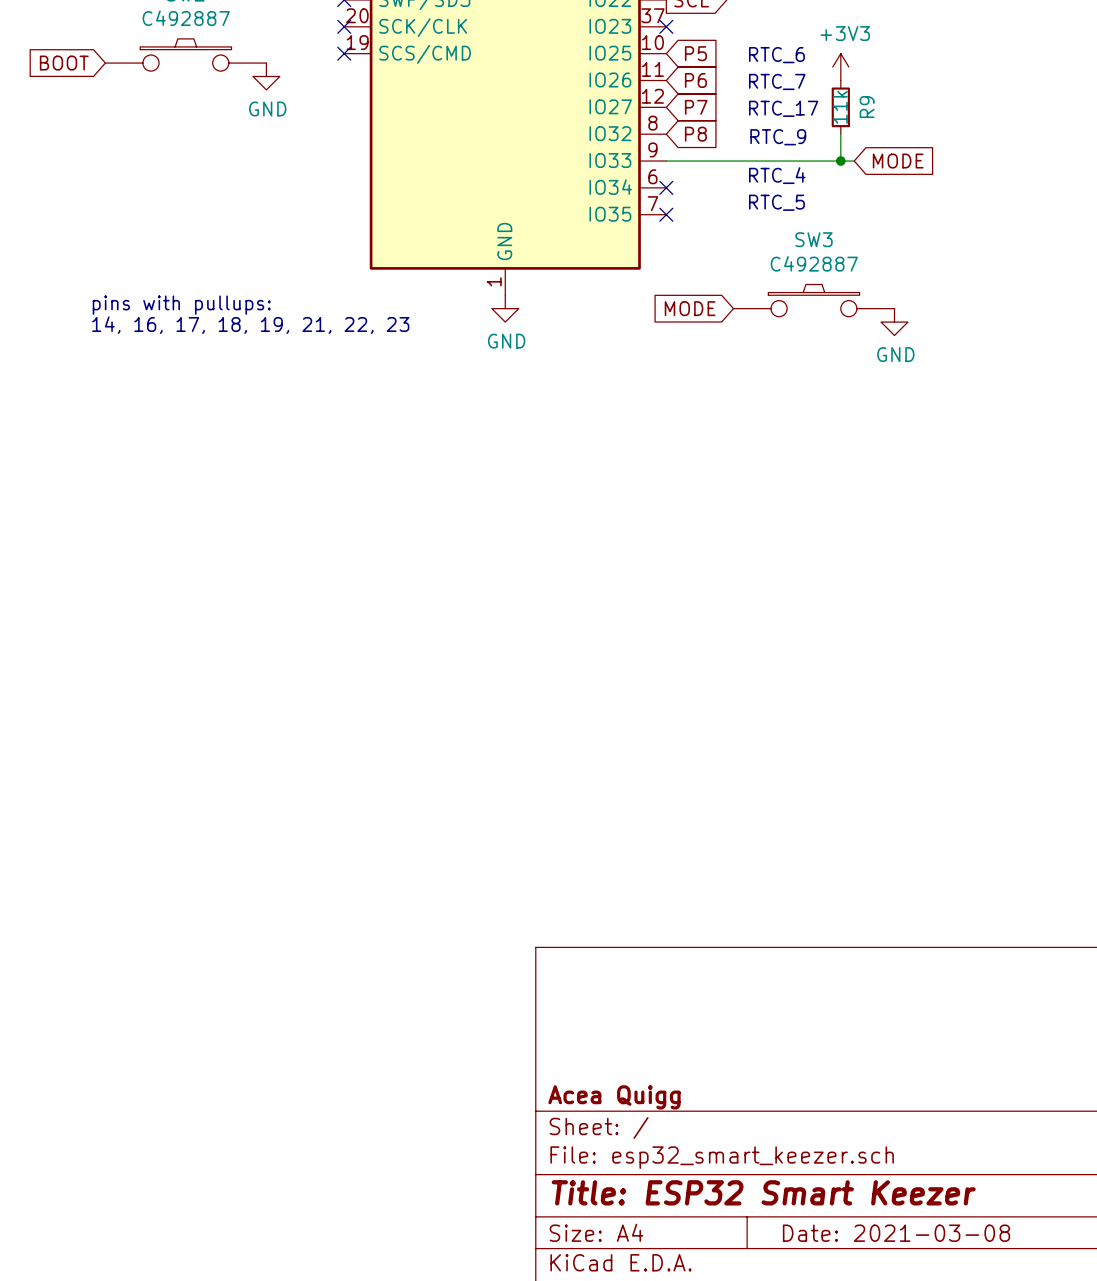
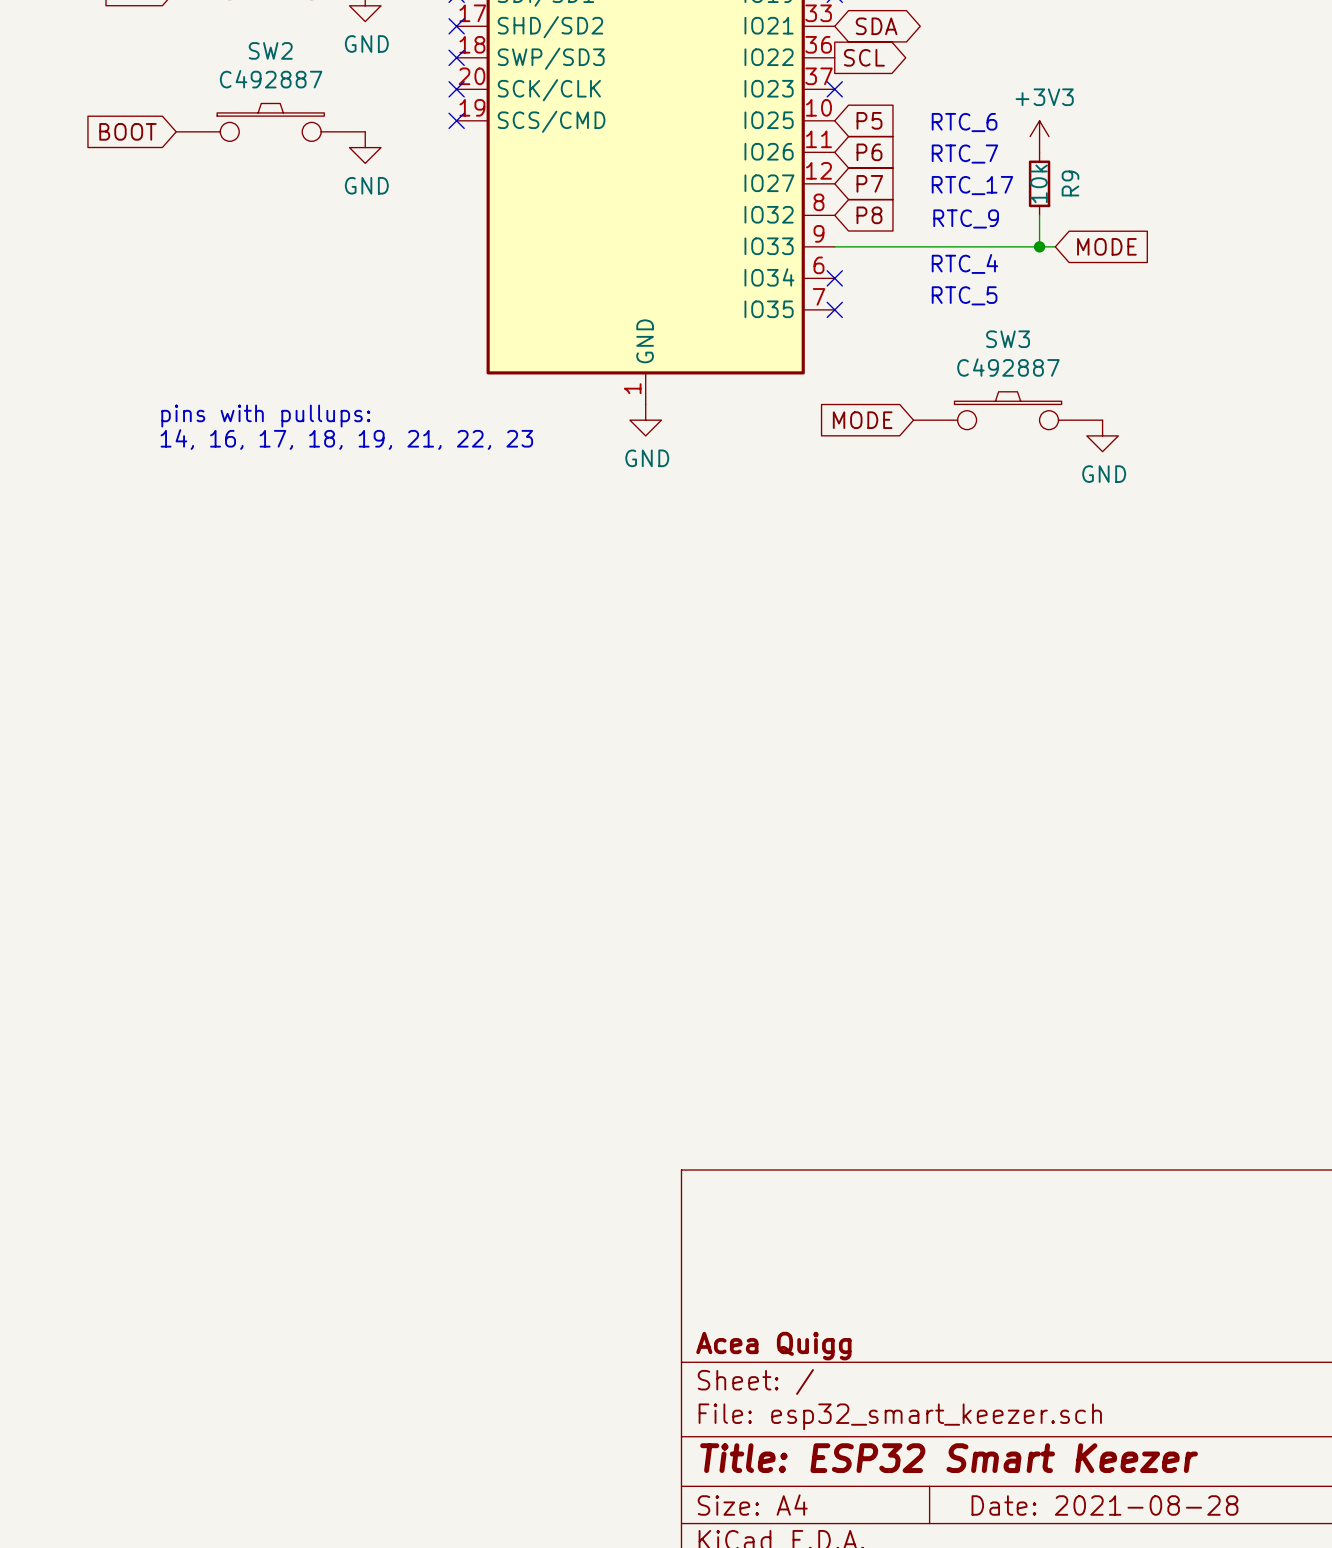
R9 value: 11k (840, 107) -> 10k (1038, 183)
title block: Date: 2021-03-08 (896, 1233) -> Date: 2021-08-28 (1104, 1505)

